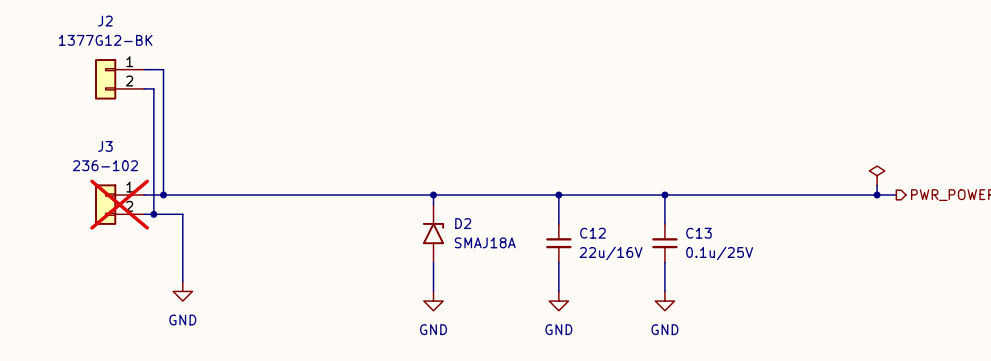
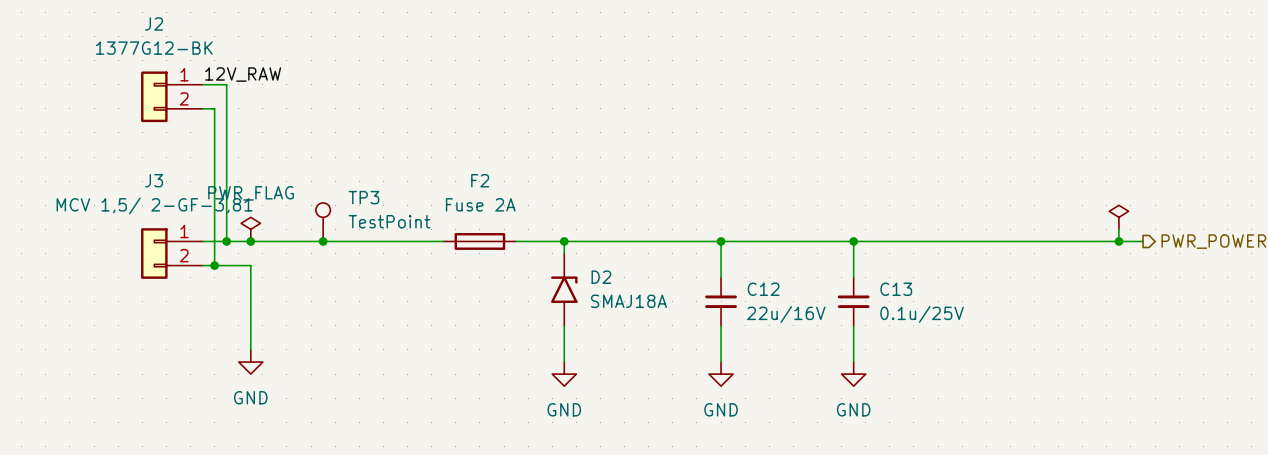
label: none -> 12V_RAW (243, 74)
J3 value: 236-102 (105, 165) -> MCV 1,5/ 2-GF-3,81 (154, 205)
TP3: none -> TestPoint (323, 222)
power symbol: none -> PWR_FLAG (250, 229)
junction: none -> (250, 241)
junction: none -> (323, 241)
F2: none -> Fuse 2A (479, 241)
J3 do-not-place cross: (119, 204) -> none

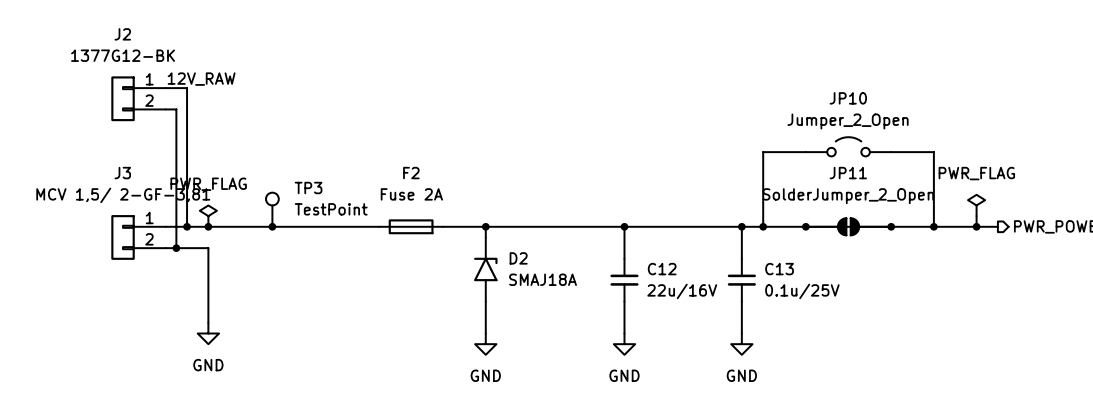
JP10: none -> Jumper_2_Open (848, 146)
wire: none -> (805, 152) (763, 152) (763, 226)
wire: none -> (891, 152) (933, 152) (933, 226)
power symbol text: none -> PWR_FLAG (976, 173)
junction: none -> (763, 226)
junction: none -> (805, 226)
JP11: none -> SolderJumper_2_Open (848, 226)
junction: none -> (891, 226)
junction: none -> (933, 226)

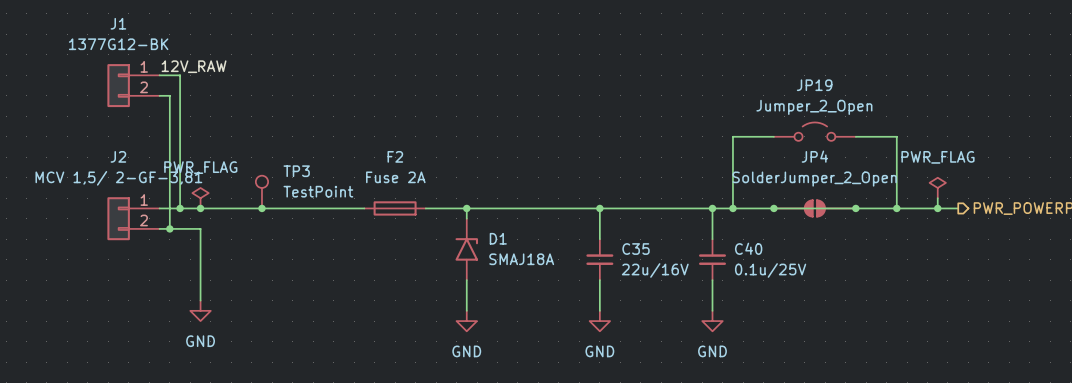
J2 name: J2 (122, 34) -> J1 (118, 23)
JP10 name: JP10 (848, 98) -> JP19 (814, 85)
J3 name: J3 (122, 173) -> J2 (118, 156)
JP11 name: JP11 (848, 173) -> JP4 (814, 156)
D2 name: D2 (518, 258) -> D1 (498, 238)
C12 name: C12 (662, 269) -> C35 (636, 249)
C13 name: C13 (779, 269) -> C40 (748, 248)

